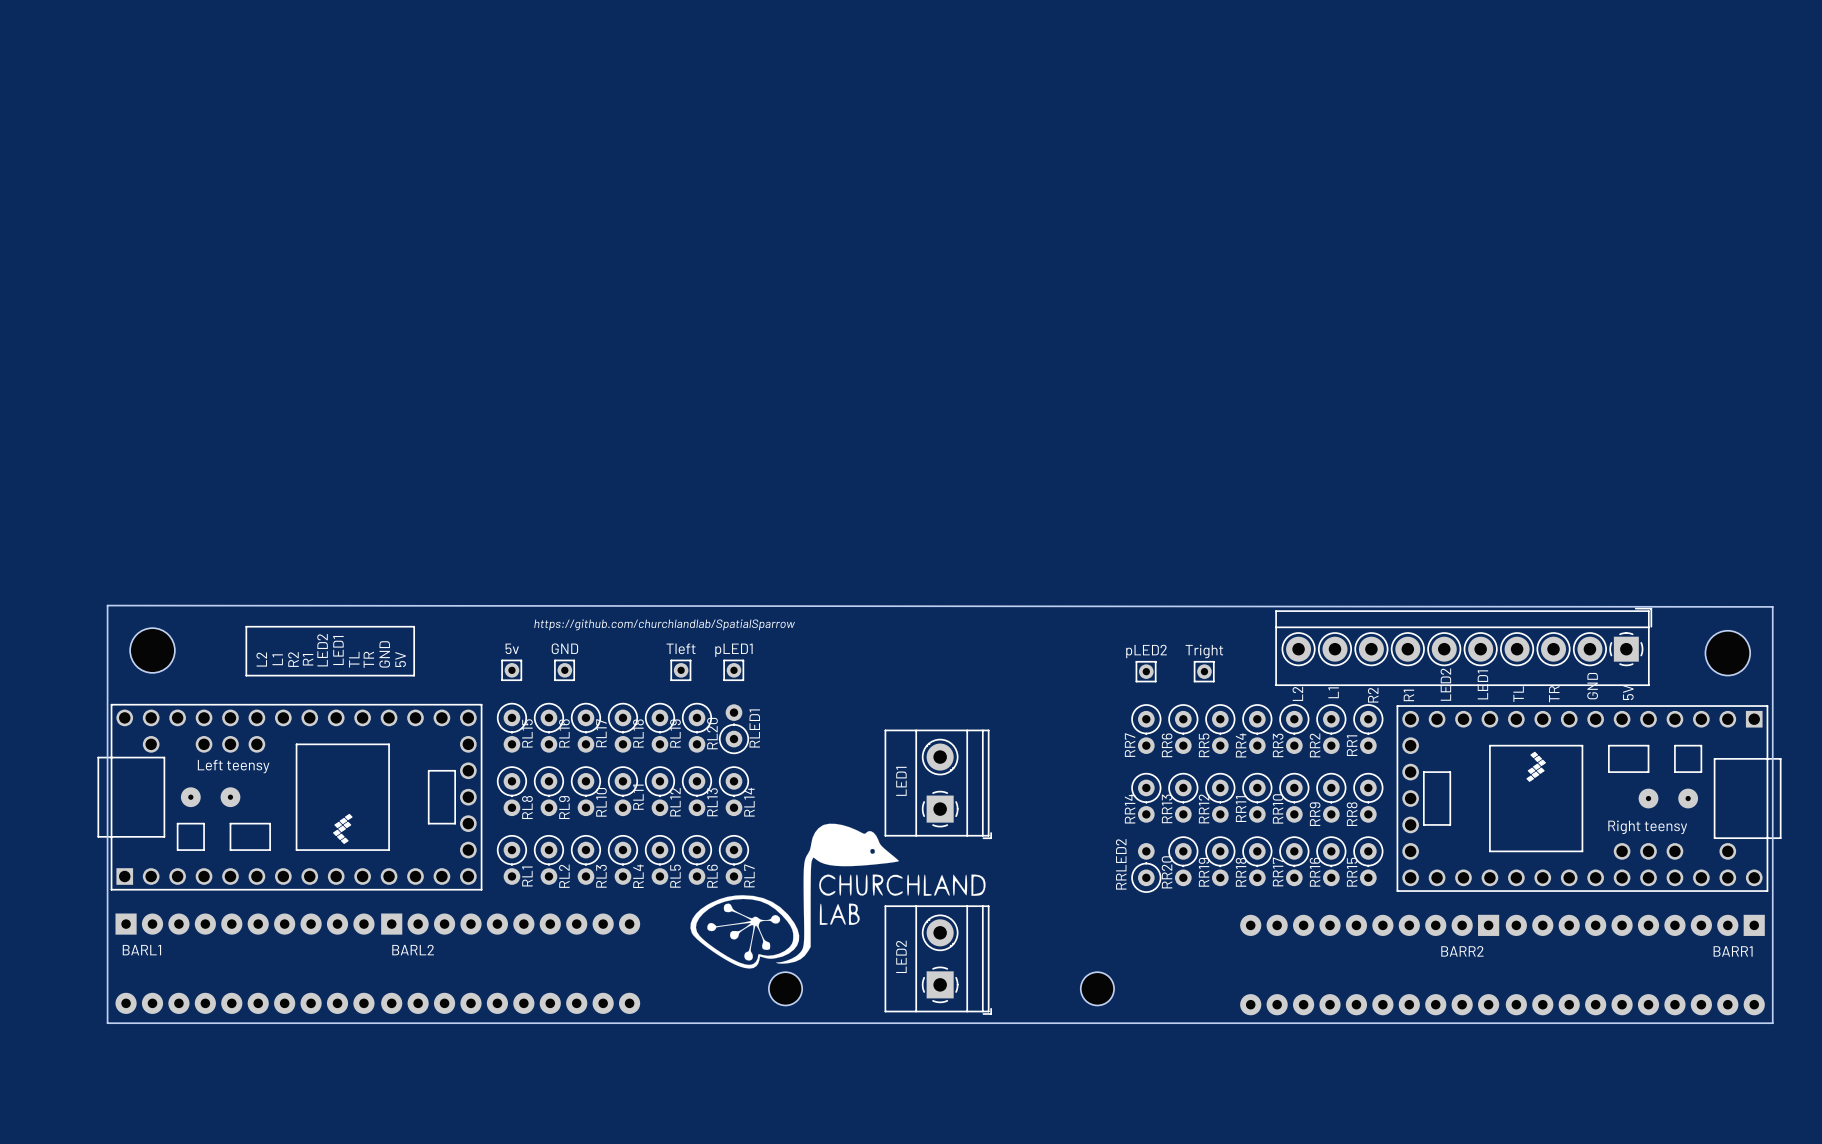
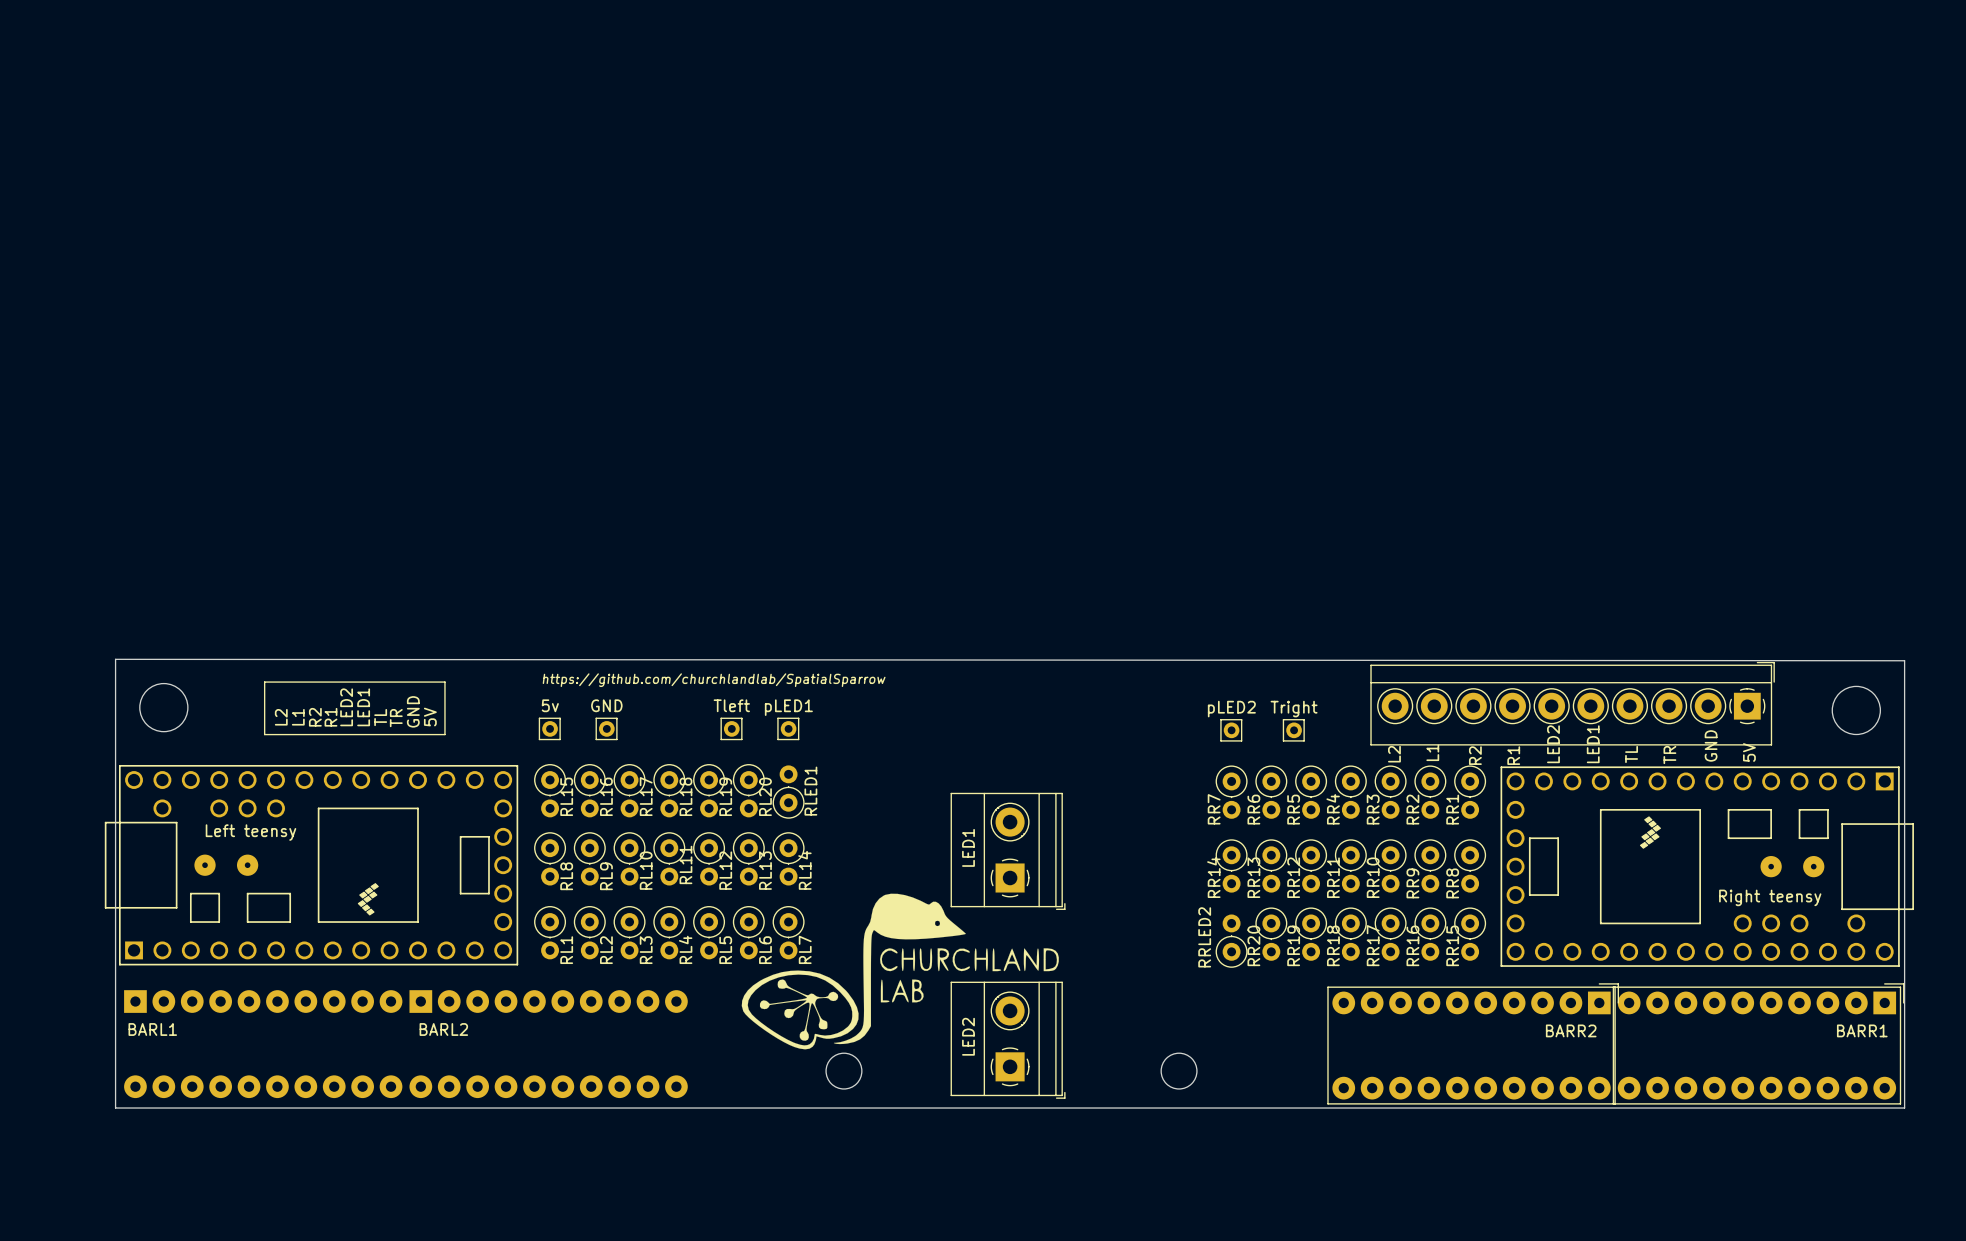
BARR2 footprint: [1240, 914, 1500, 1016] -> [1327, 983, 1620, 1105]
BARR1 footprint: [1505, 914, 1765, 1016] -> [1612, 983, 1905, 1105]

